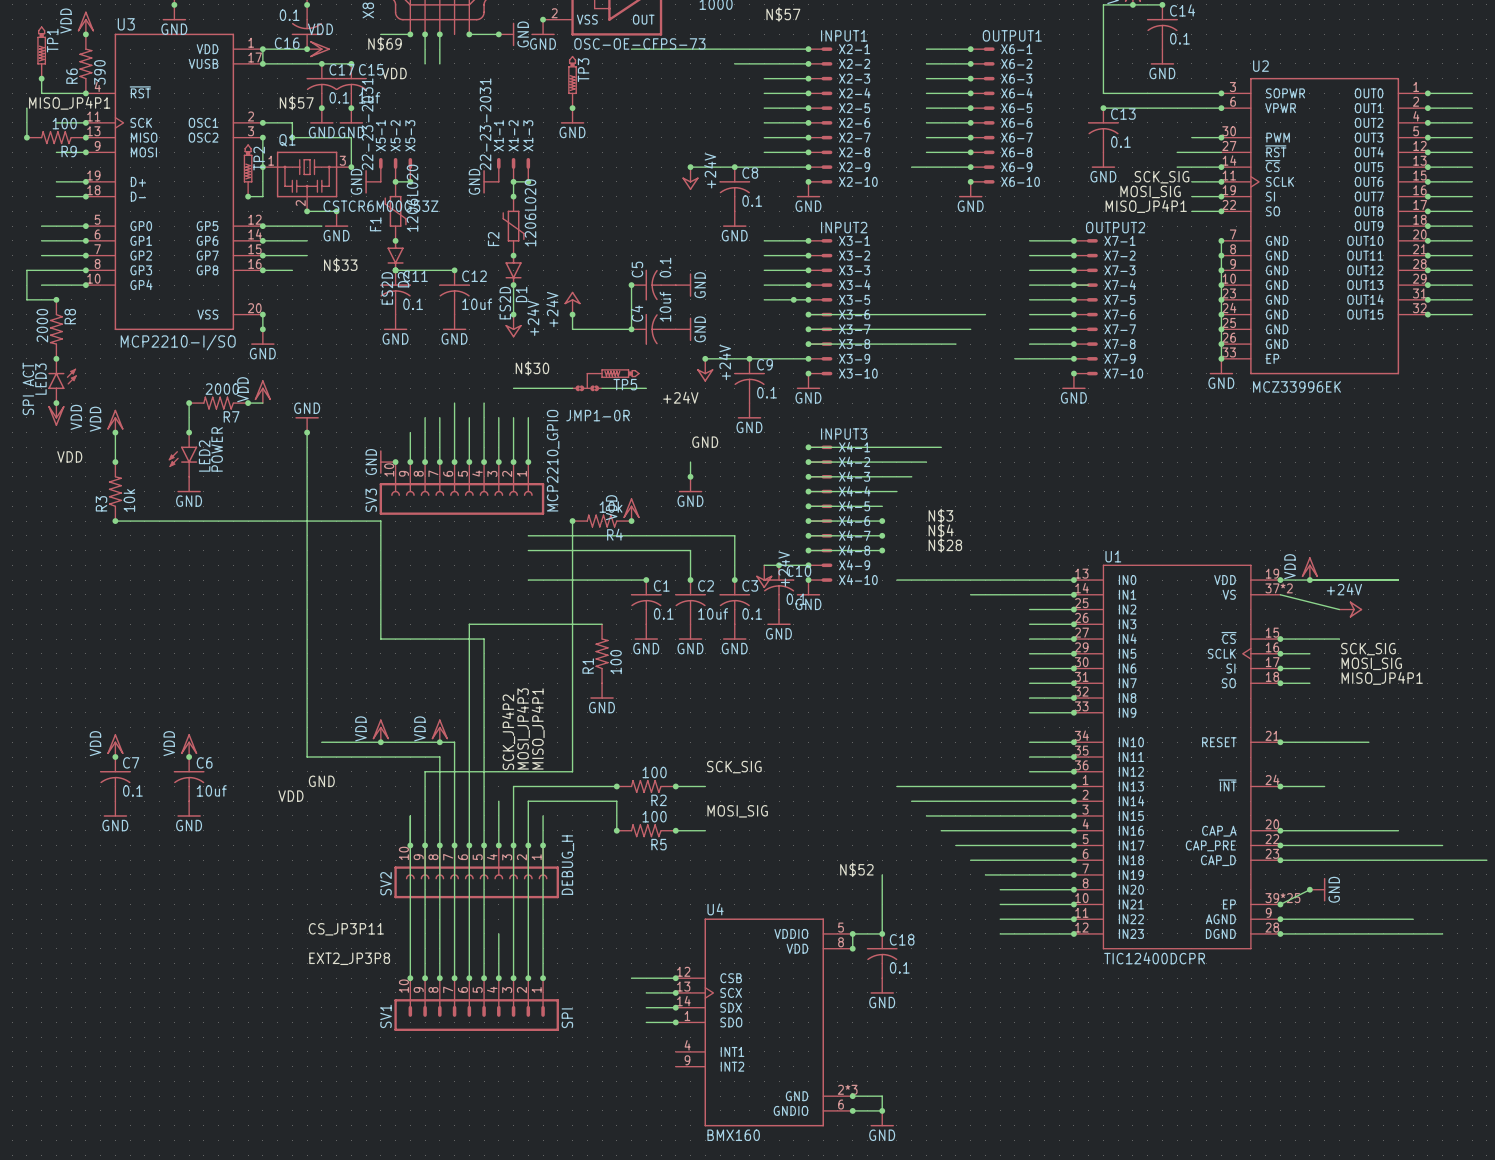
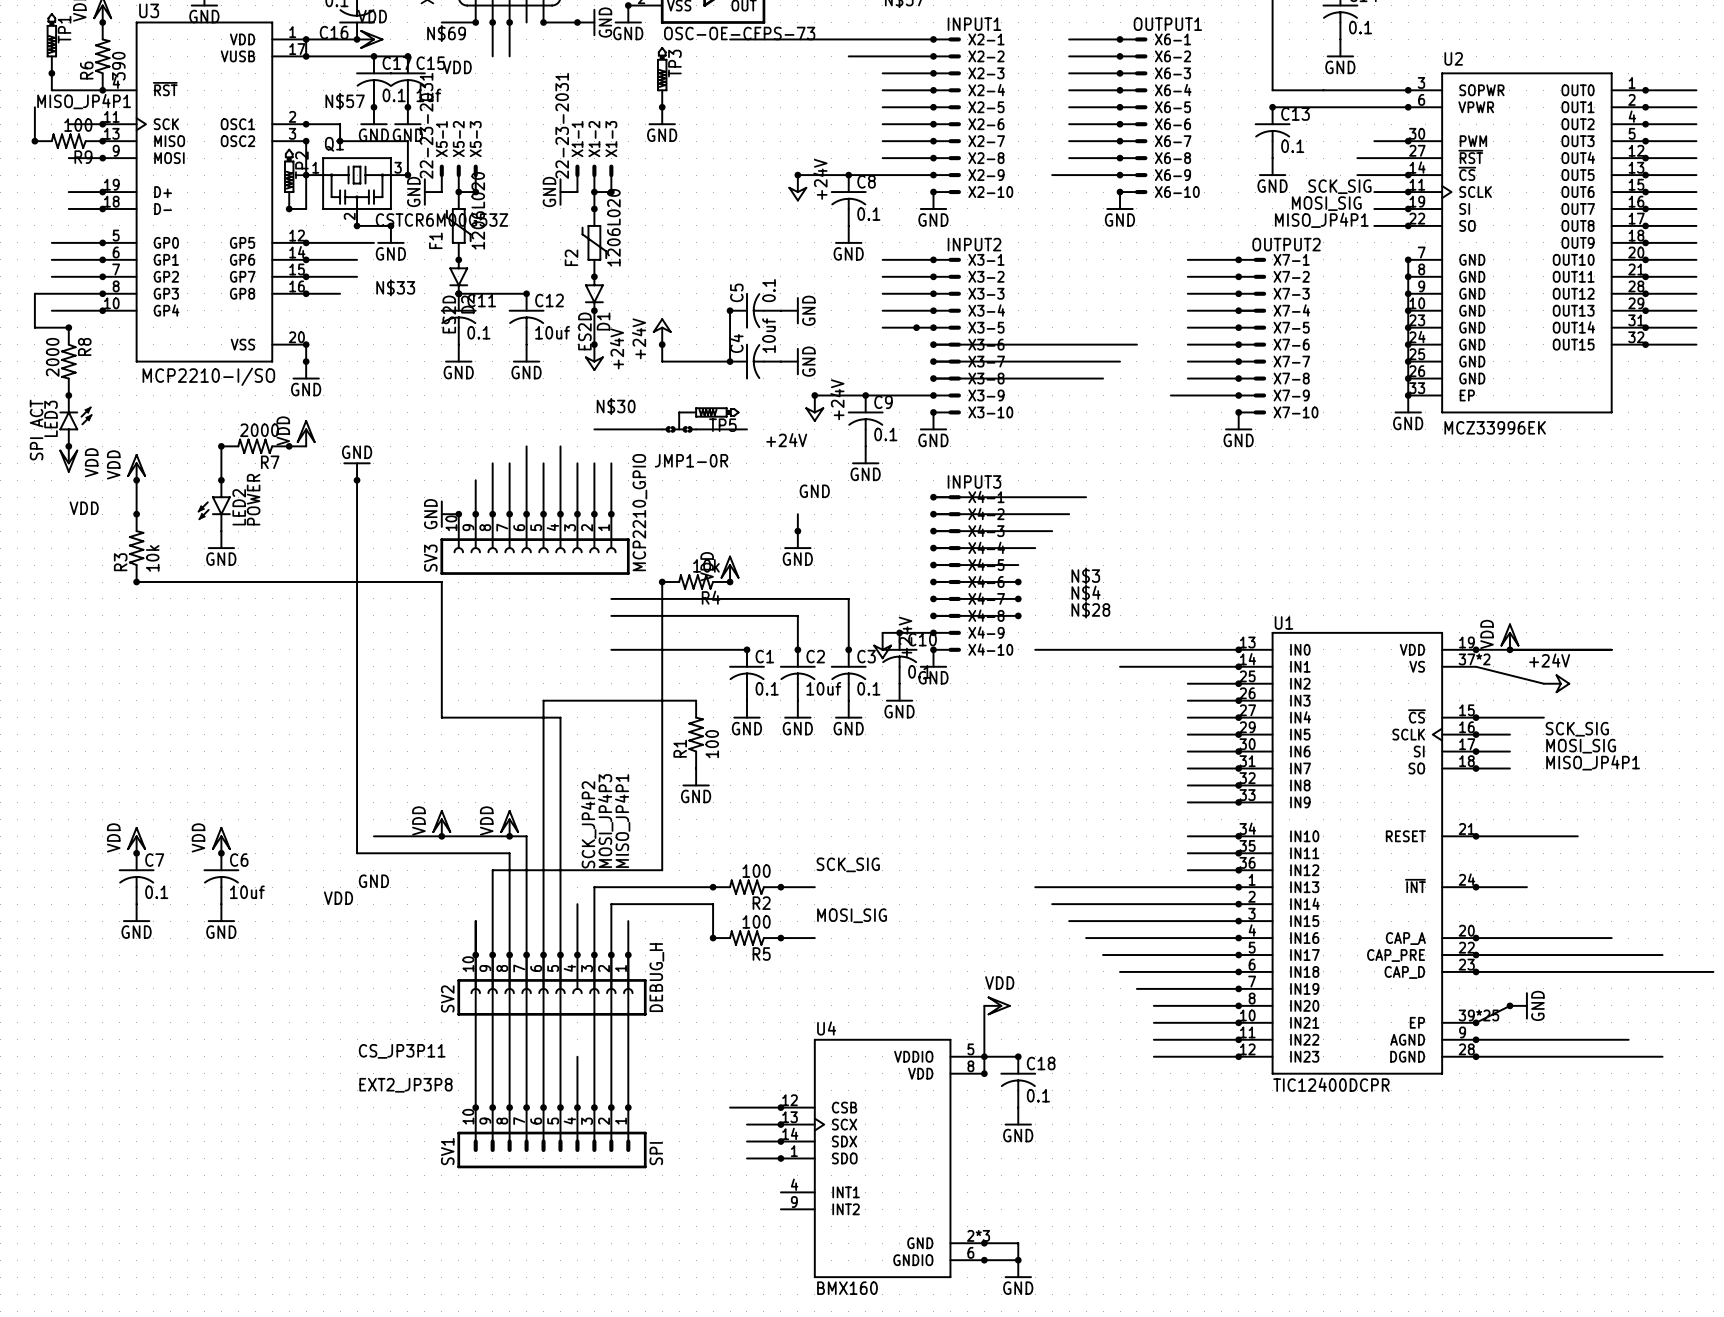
label: N$52 (856, 869) -> none
wire: (882, 874) (882, 933) -> none
wire: none -> (984, 1005) (984, 1056)
power symbol: none -> VDD (997, 1005)

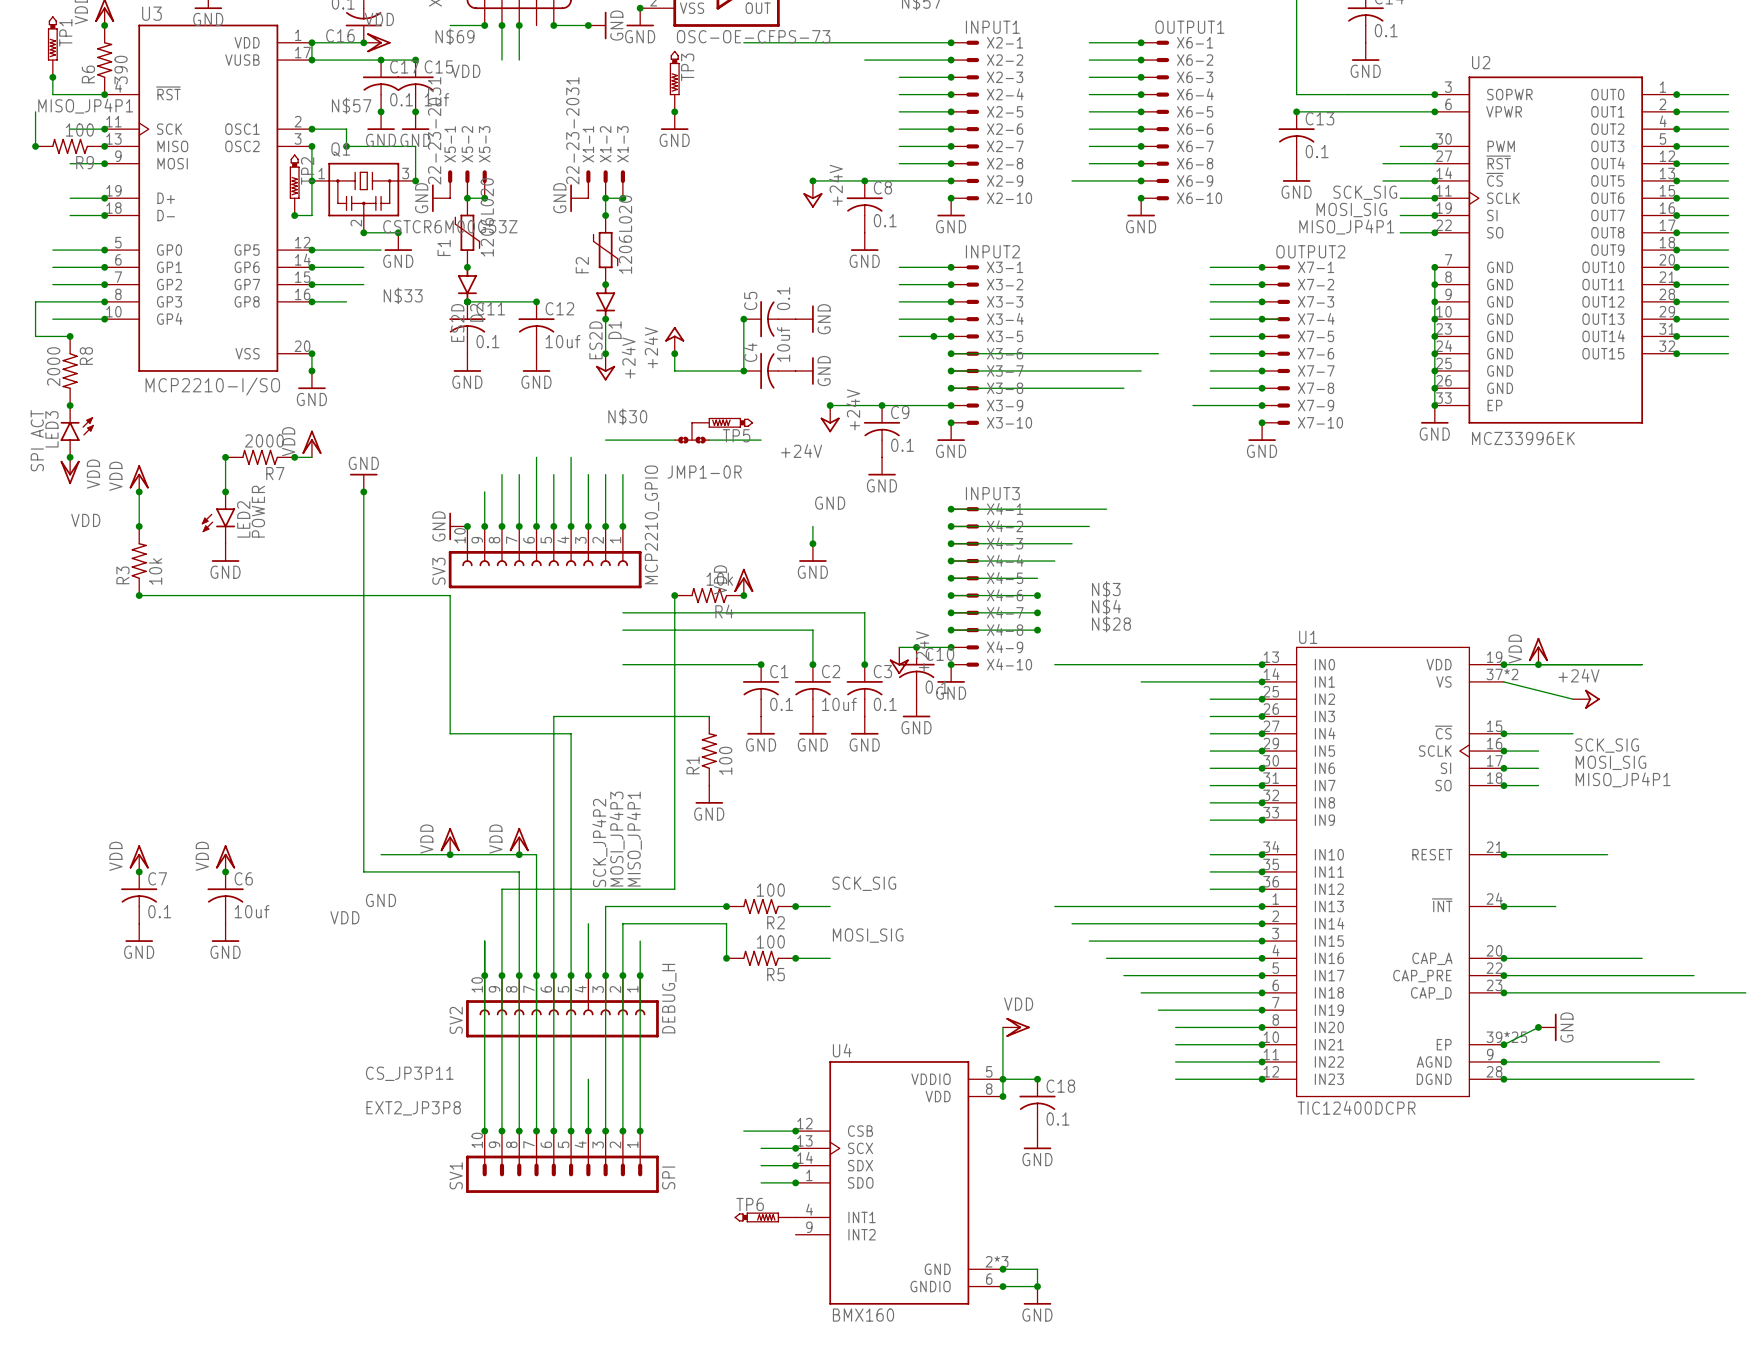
TP6: none -> (765, 1217)

